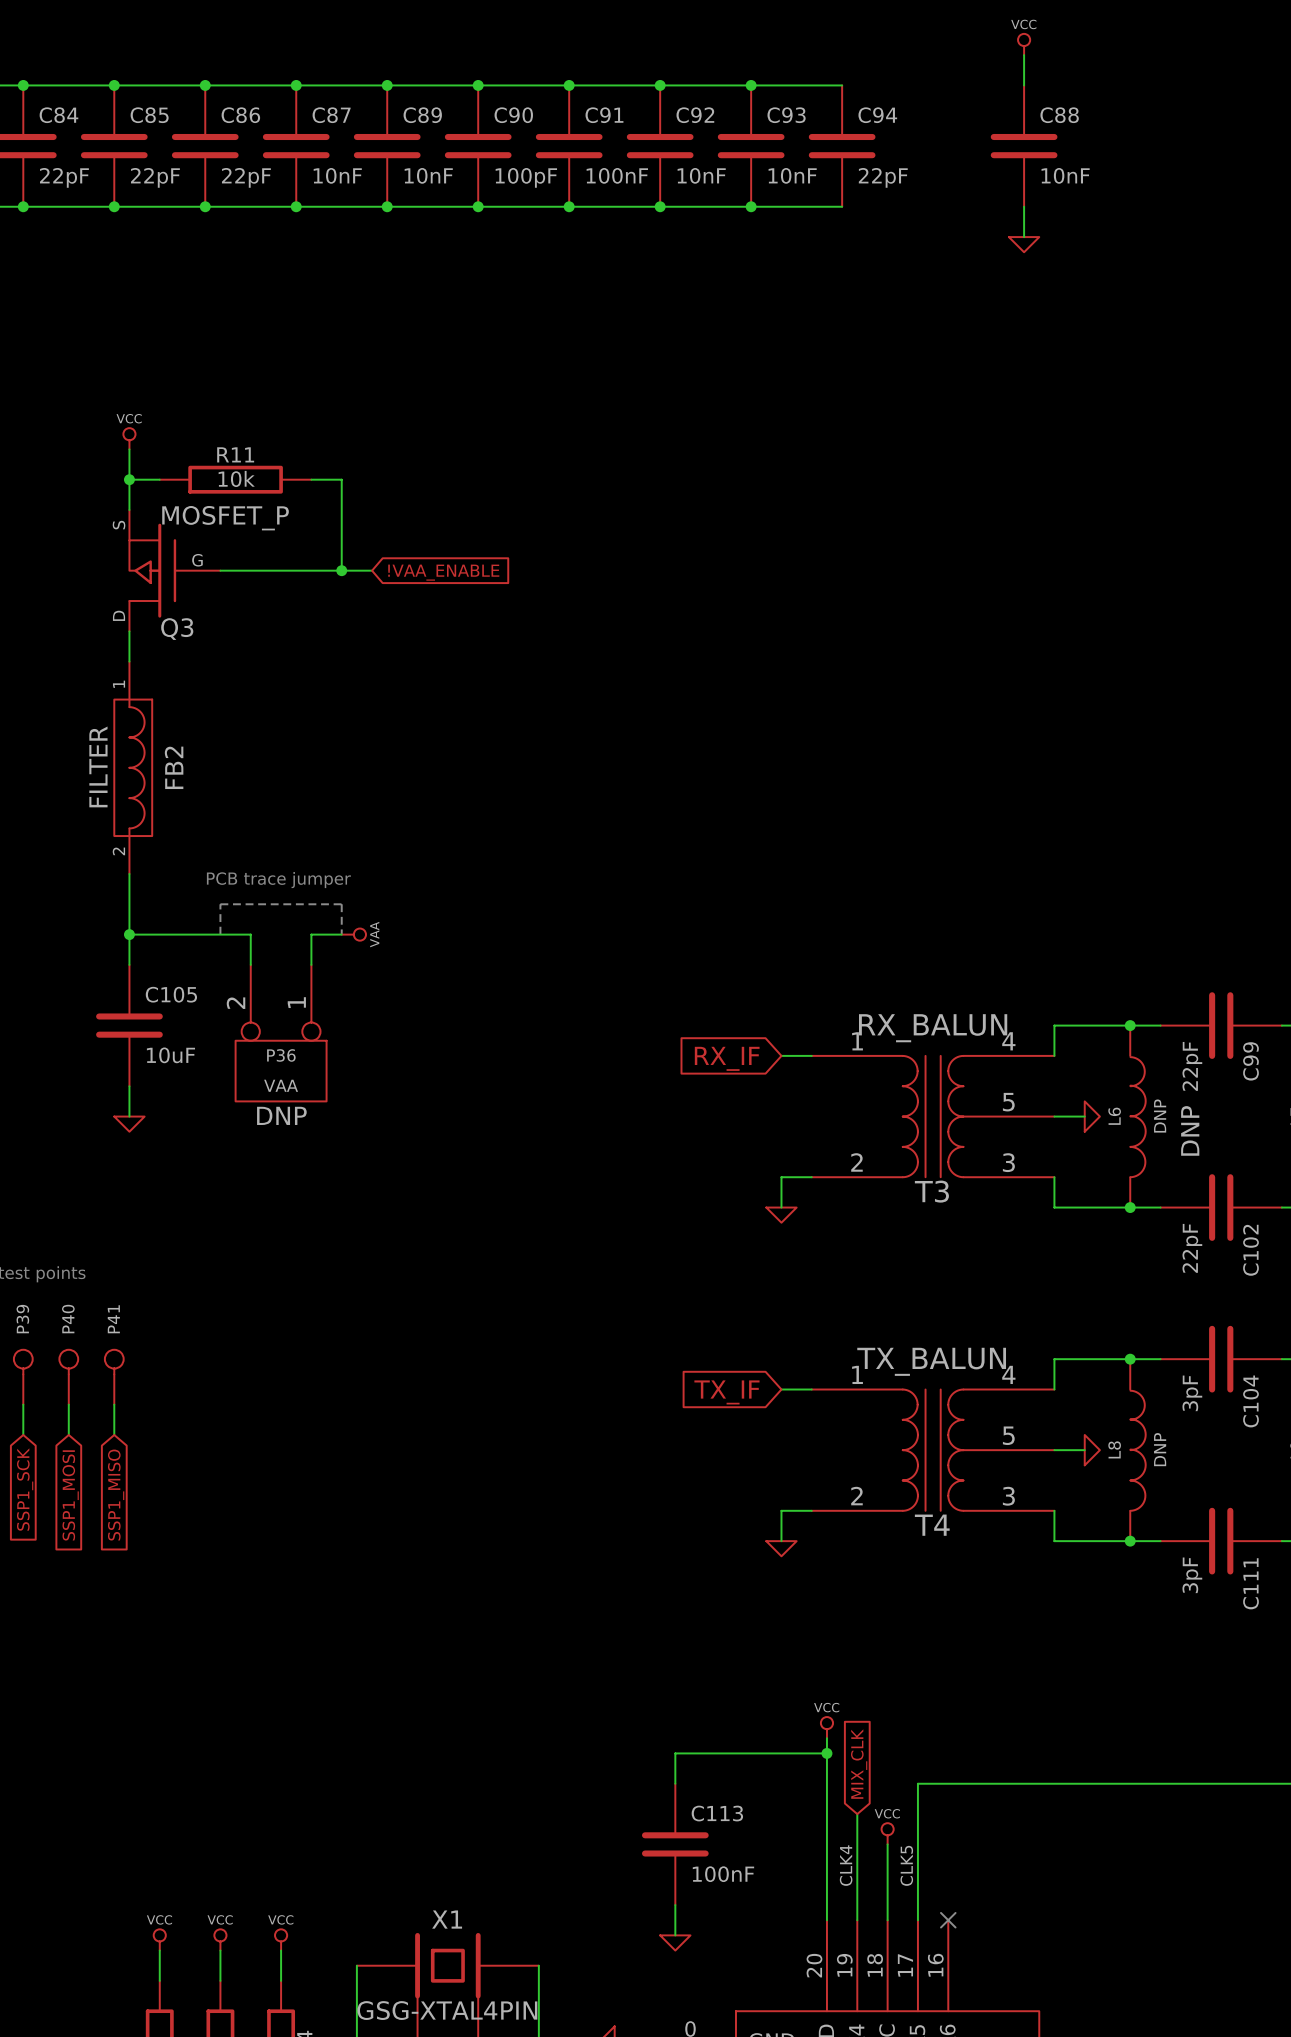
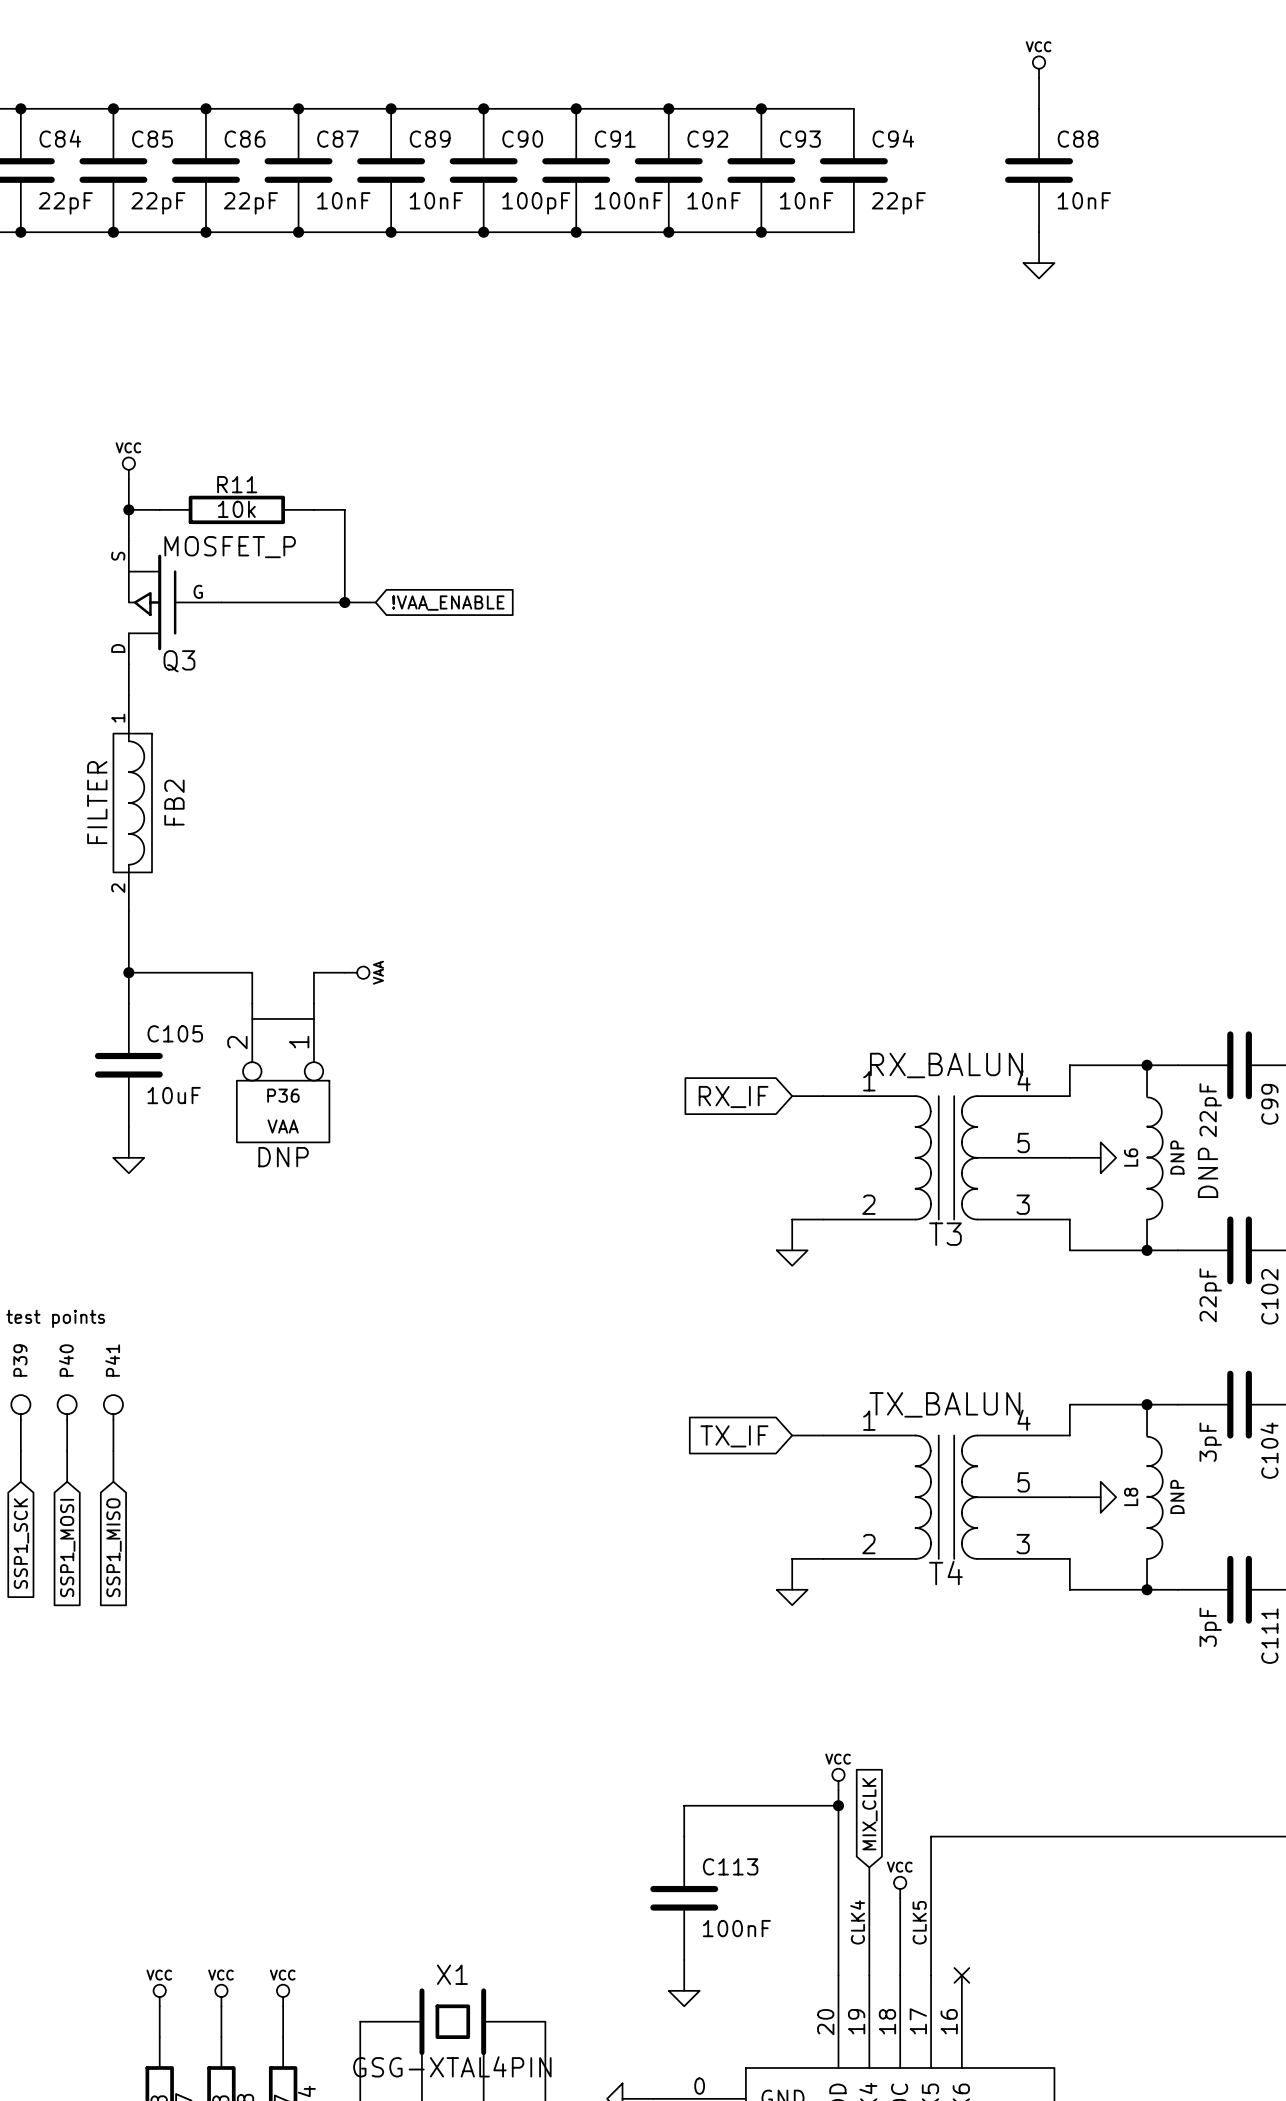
text: PCB trace jumper (278, 880) -> none
line: (220, 934) (220, 904) (341, 904) (341, 934) -> none
P36 symbol: [235, 964, 327, 1102] -> [236, 1003, 330, 1143]

